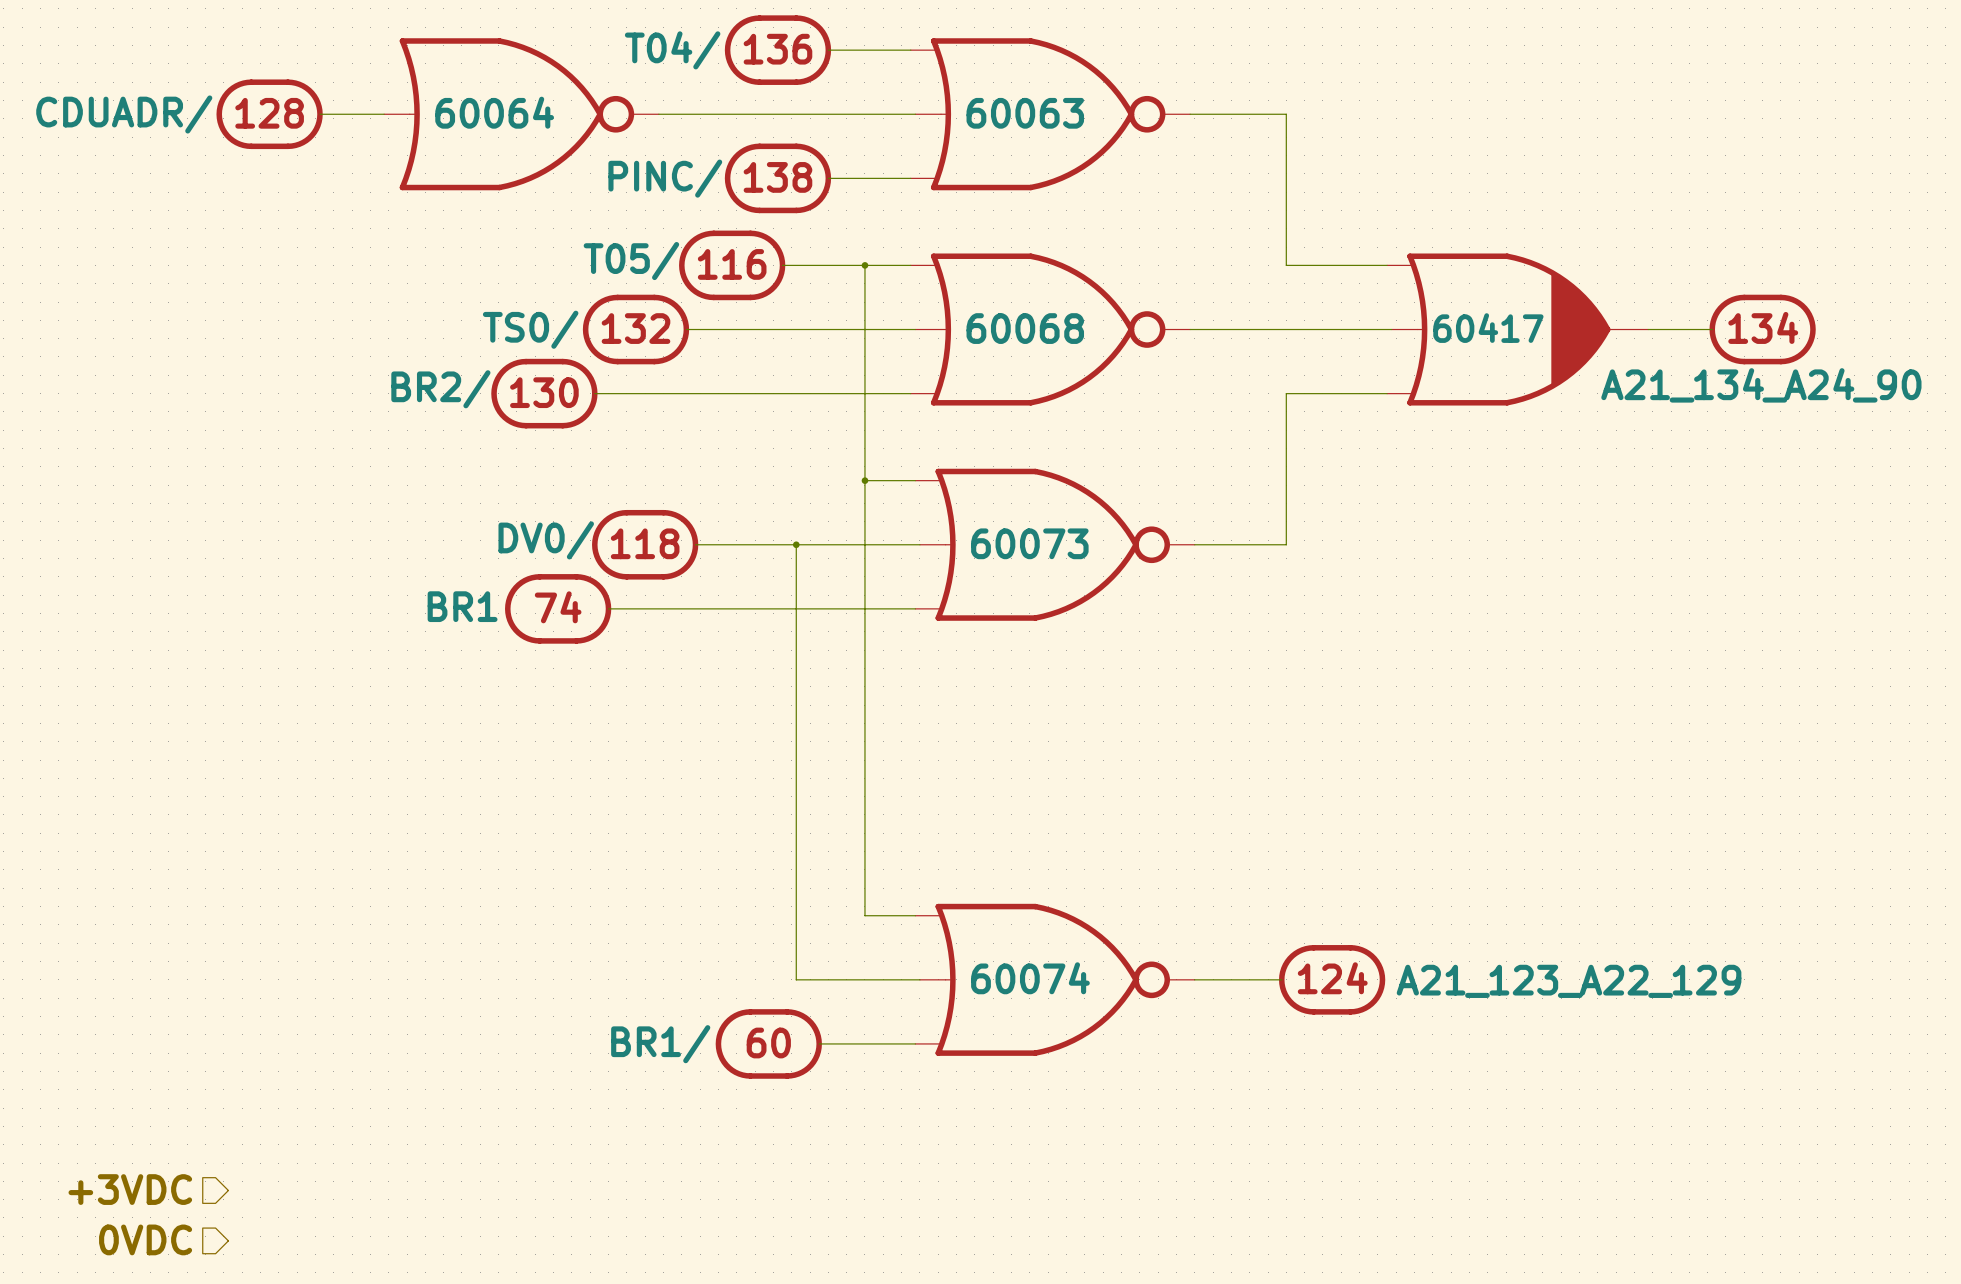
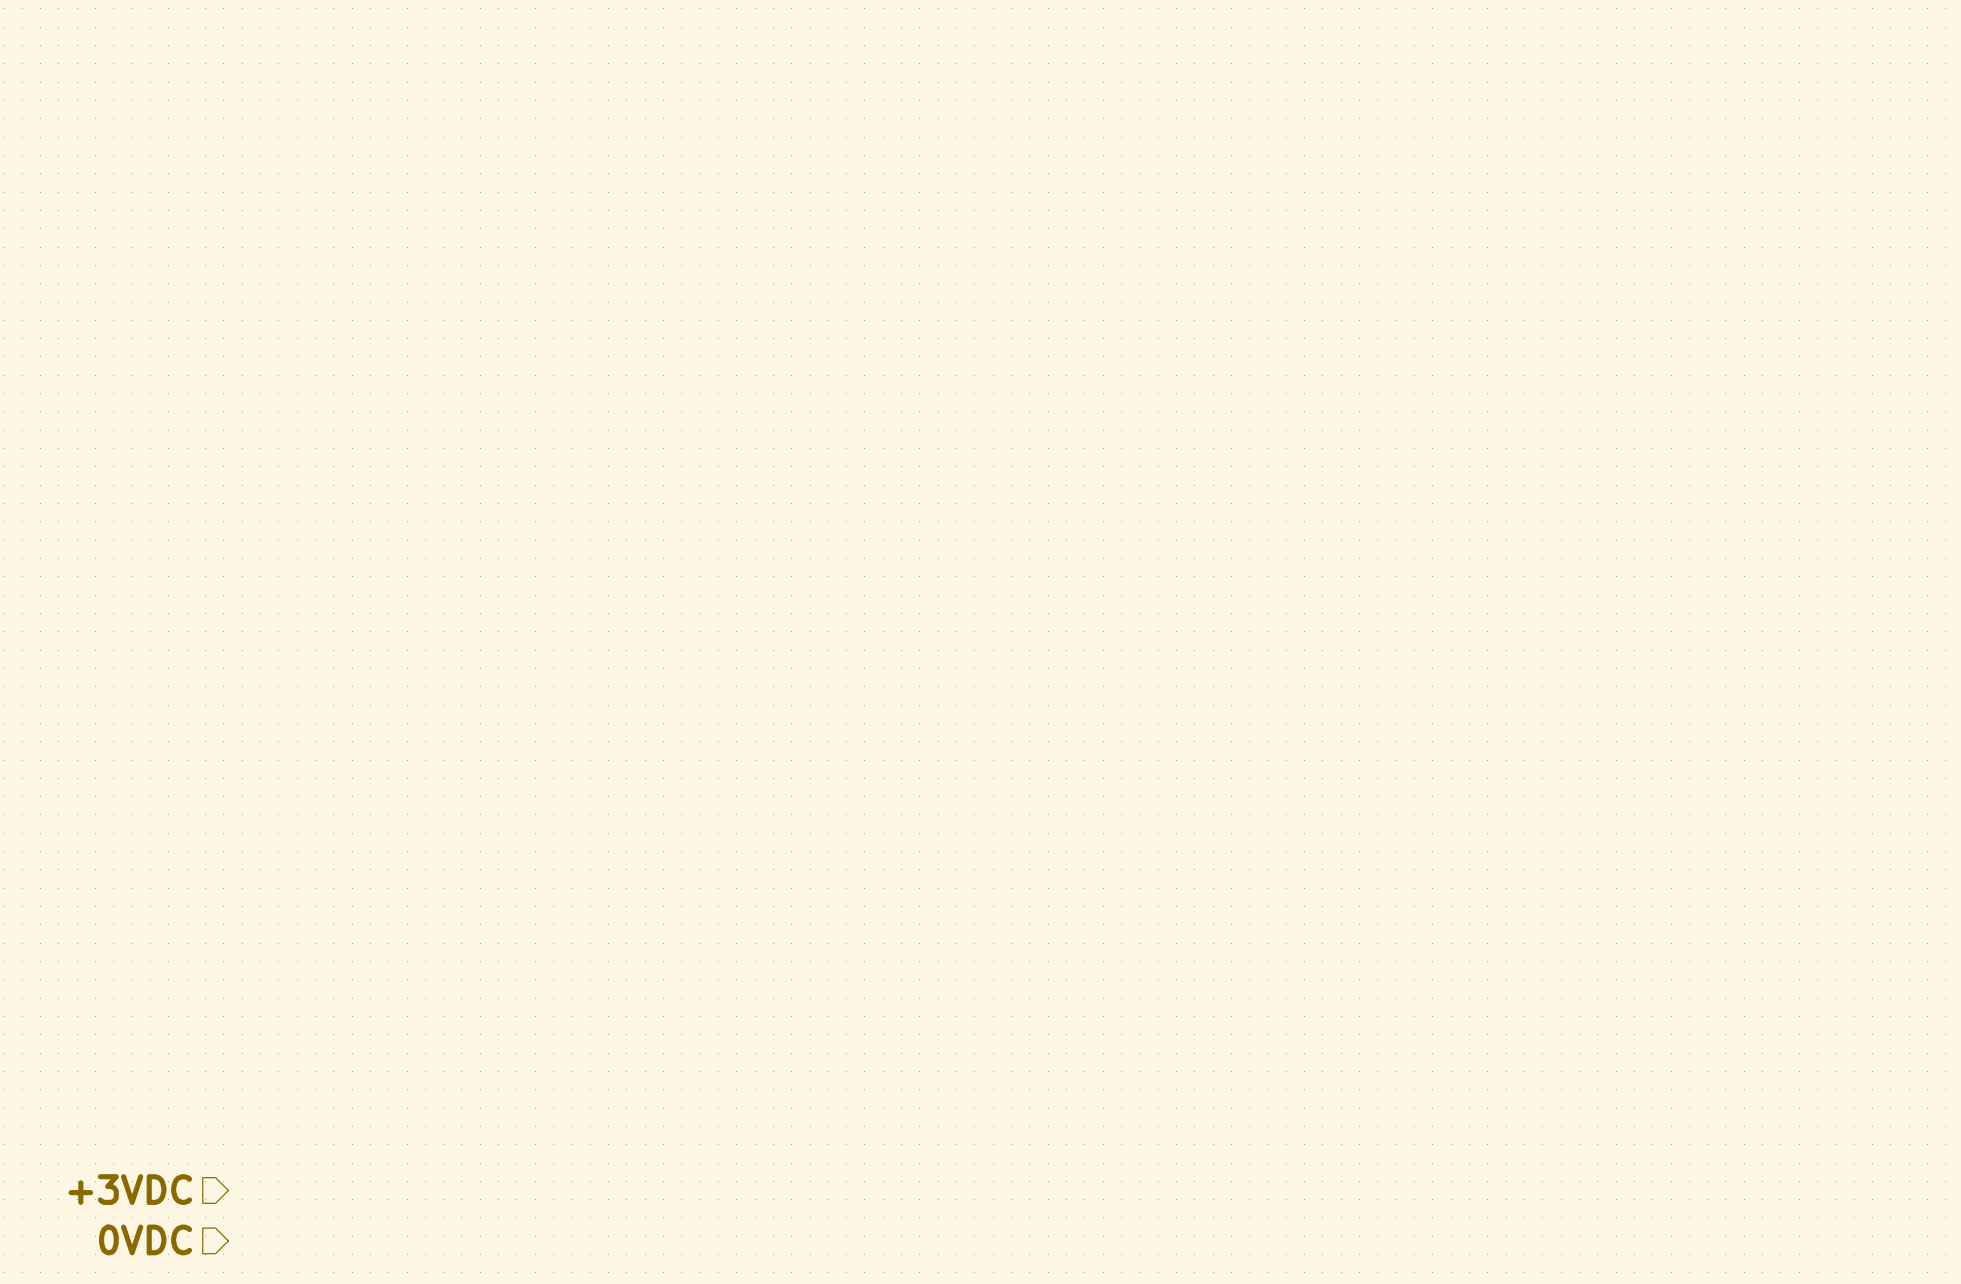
part: (777, 50) -> none
wire: (828, 50) (910, 50) -> none
part: (269, 114) -> none
wire: (319, 114) (384, 114) -> none
part: (521, 114) -> none
wire: (658, 114) (915, 114) -> none
part: (1050, 114) -> none
wire: (1190, 114) (1286, 114) (1286, 265) (1387, 265) -> none
part: (777, 178) -> none
wire: (828, 178) (910, 178) -> none
part: (732, 265) -> none
wire: (782, 265) (910, 265) -> none
wire: (864, 265) (864, 915) (915, 915) -> none
junction: (864, 265) -> none
part: (635, 329) -> none
wire: (686, 329) (915, 329) -> none
part: (1050, 329) -> none
wire: (1190, 329) (1391, 329) -> none
part: (1517, 329) -> none
wire: (1648, 329) (1712, 329) -> none
part: (1762, 329) -> none
part: (544, 393) -> none
wire: (594, 393) (910, 393) -> none
wire: (1387, 393) (1286, 393) (1286, 544) (1194, 544) -> none
wire: (864, 480) (915, 480) -> none
junction: (864, 480) -> none
part: (645, 544) -> none
wire: (695, 544) (919, 544) -> none
wire: (796, 544) (796, 979) (919, 979) -> none
junction: (796, 544) -> none
part: (1055, 544) -> none
part: (558, 608) -> none
wire: (608, 608) (915, 608) -> none
part: (1055, 979) -> none
wire: (1194, 979) (1281, 979) -> none
part: (1332, 979) -> none
part: (768, 1043) -> none
wire: (819, 1043) (915, 1043) -> none

